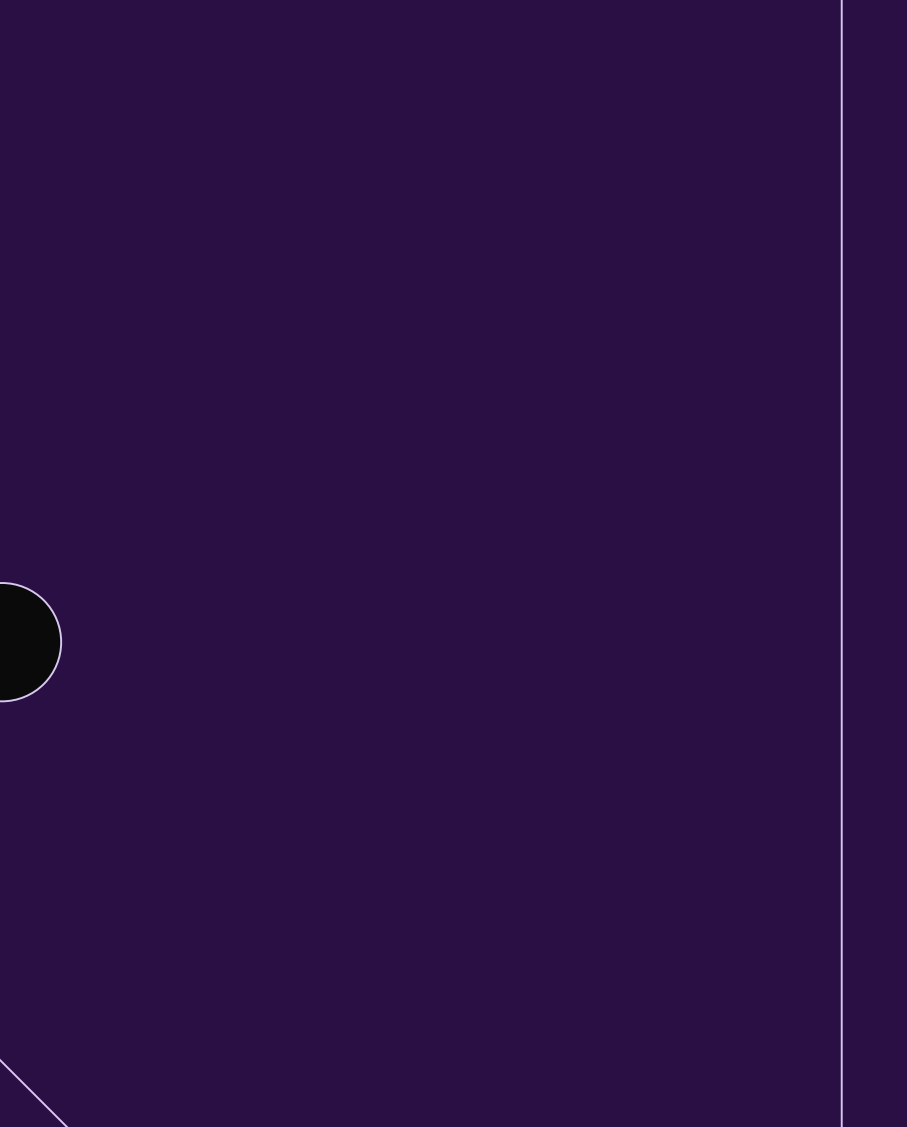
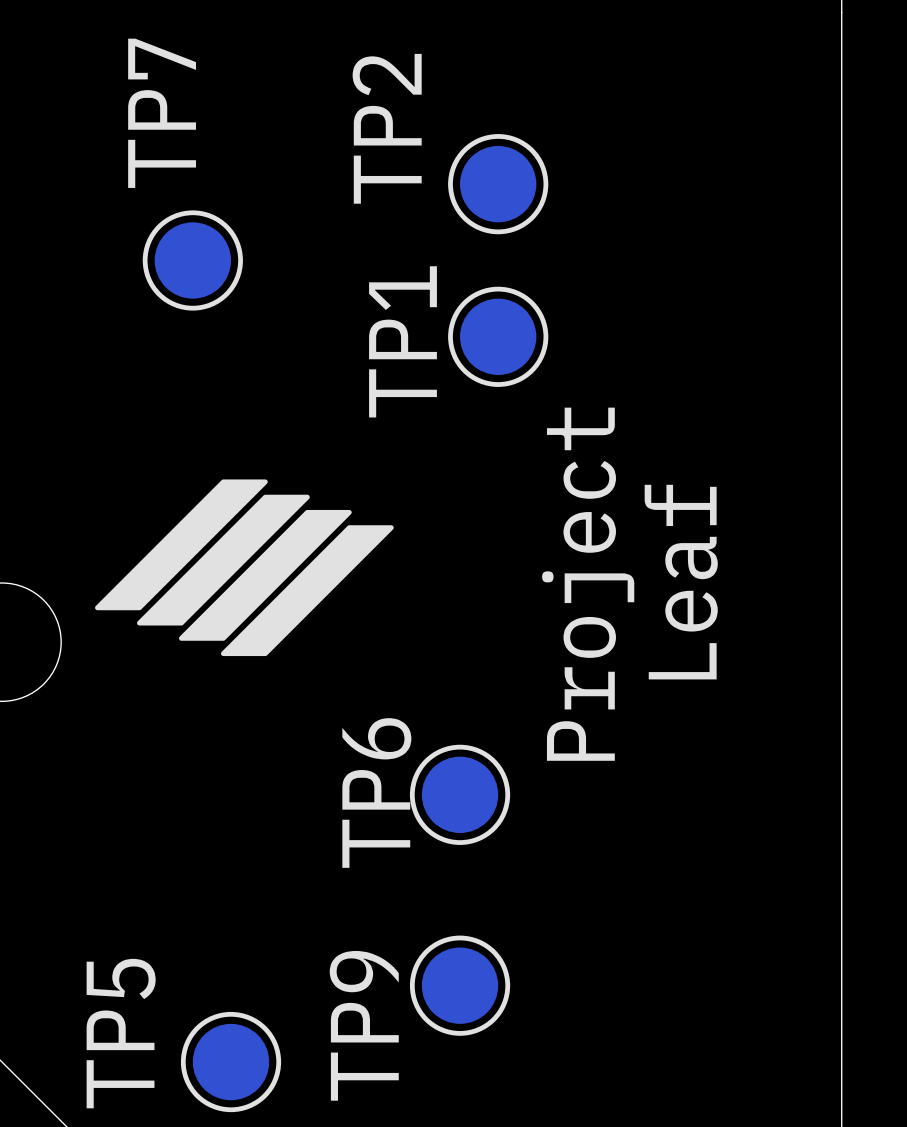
TP2: none -> (498, 184)
TP7: none -> (192, 260)
TP1: none -> (498, 336)
drawing: none -> [95, 479, 394, 657]
text: none -> Project (588, 584)
text: none -> Leaf (681, 582)
TP6: none -> (460, 794)
TP9: none -> (460, 985)
TP5: none -> (231, 1062)

